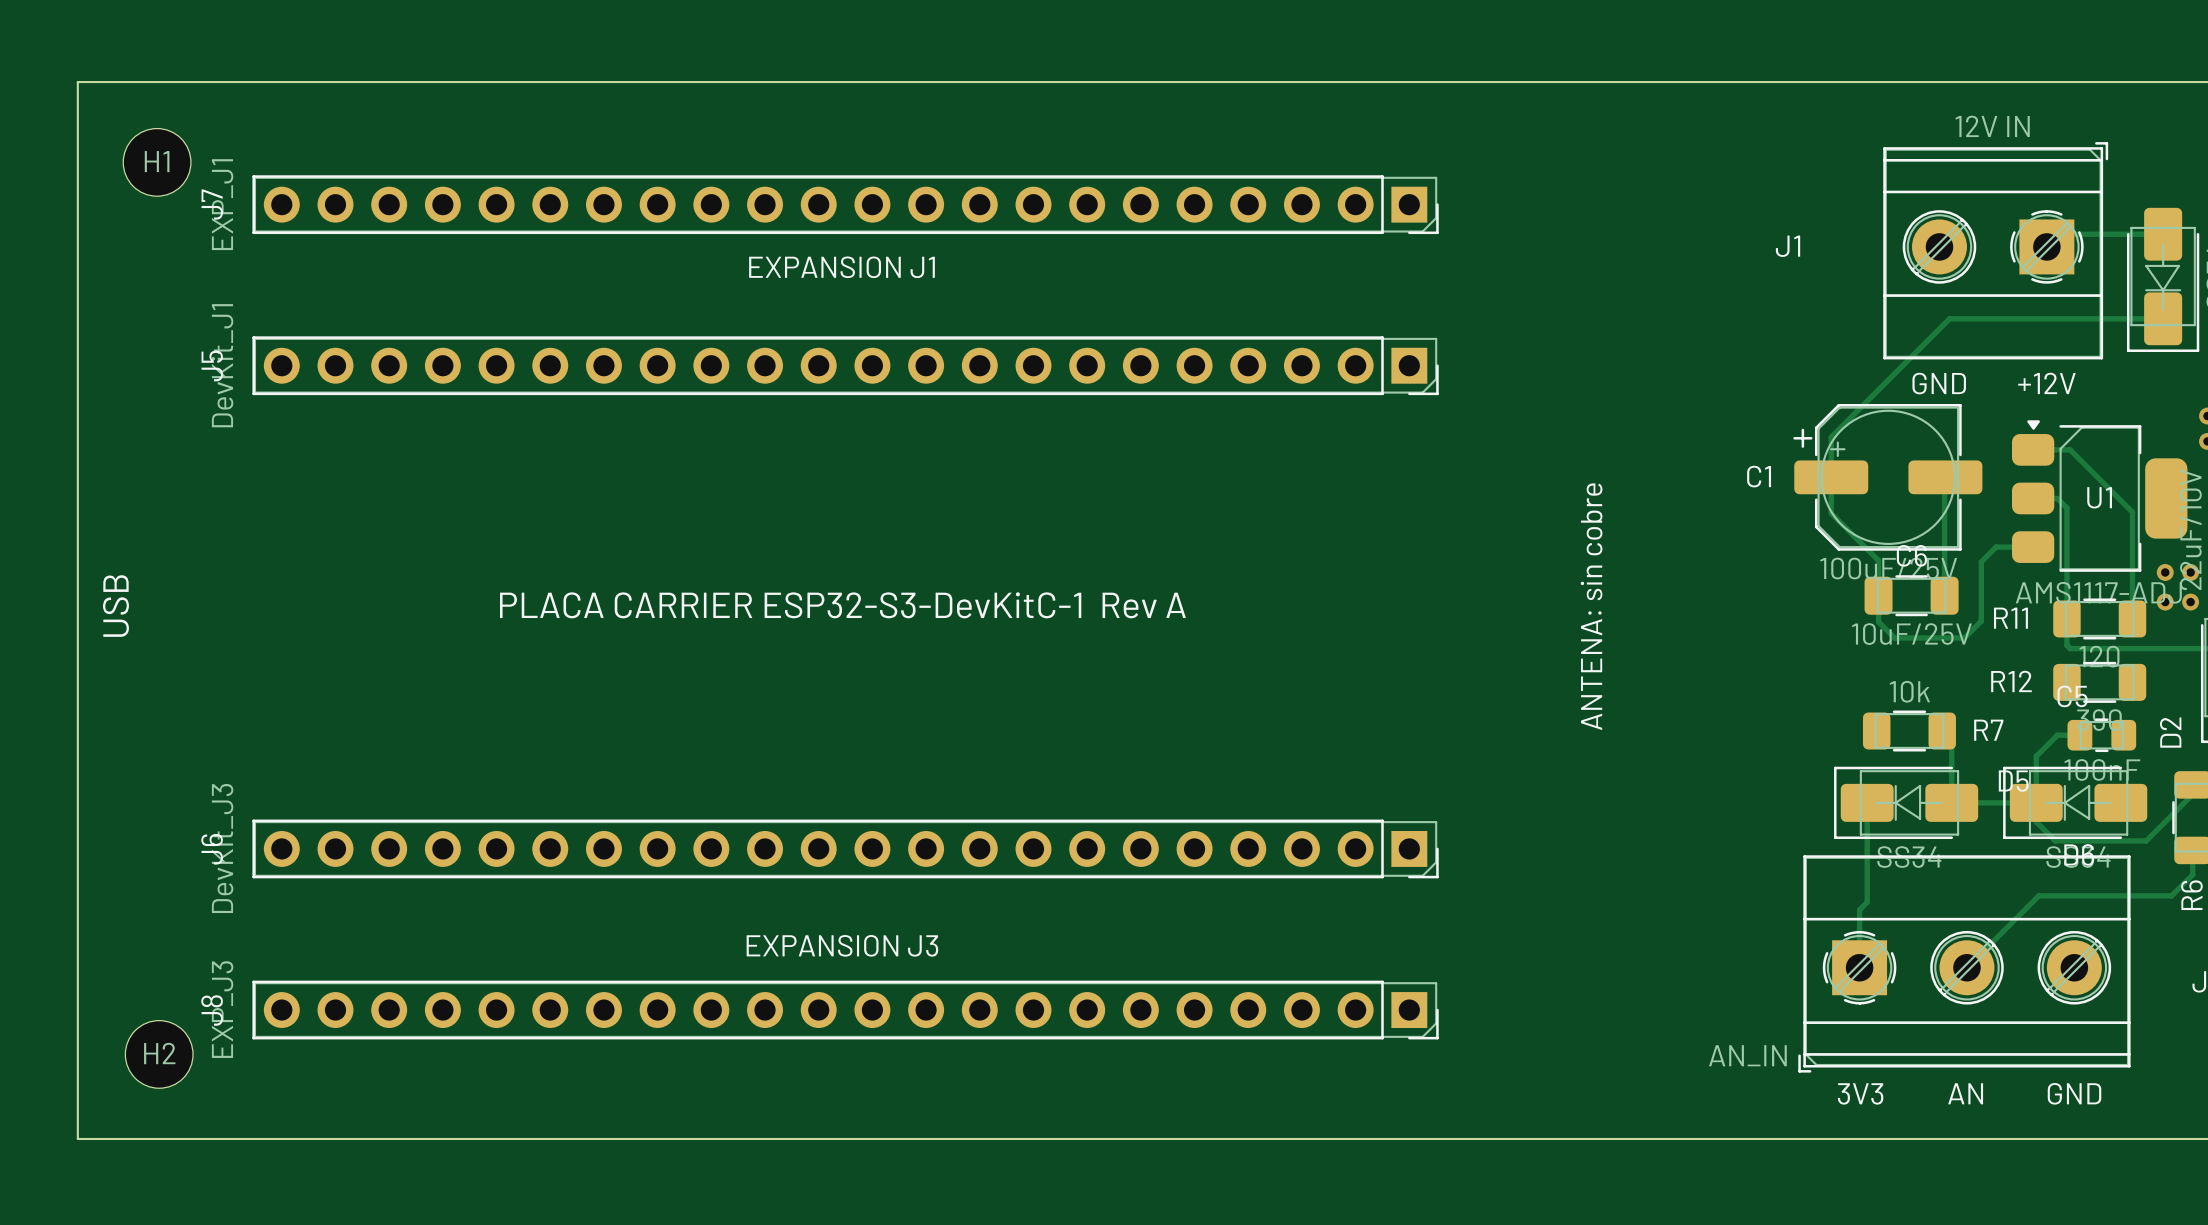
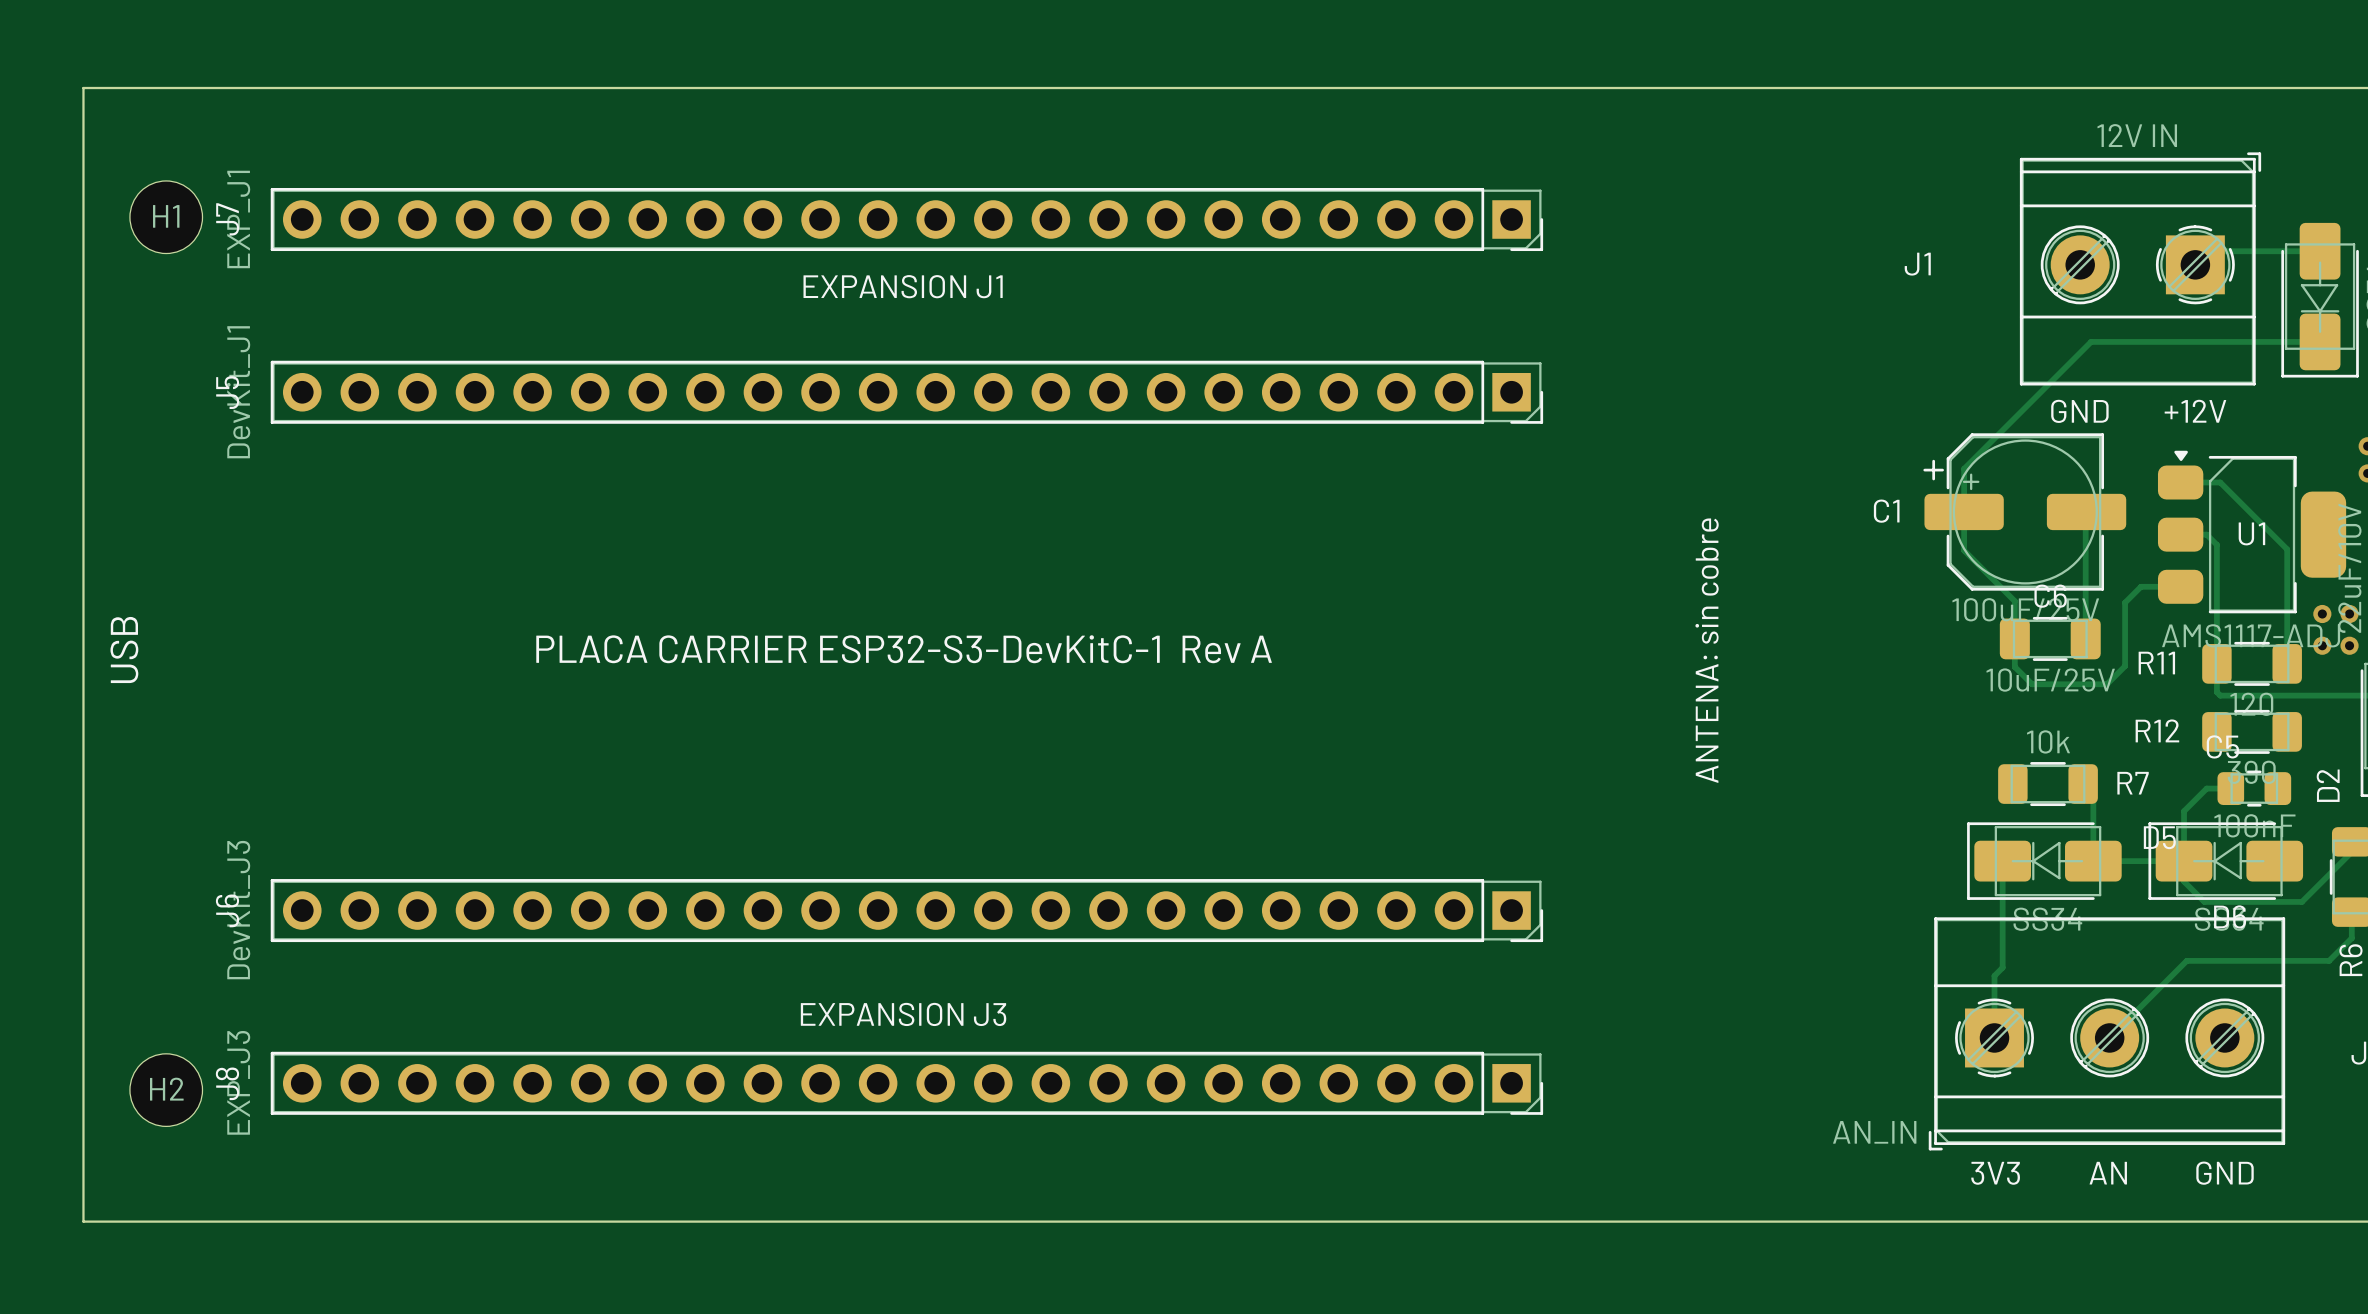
H1 position: (157, 162) -> (166, 217)
H2 position: (159, 1054) -> (166, 1090)

